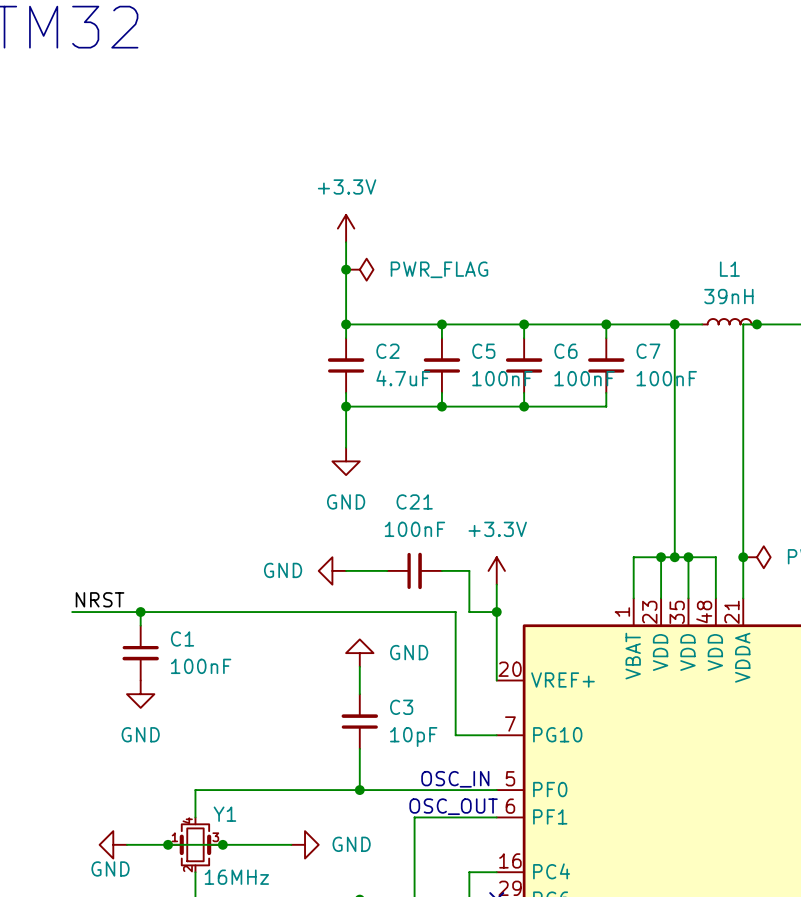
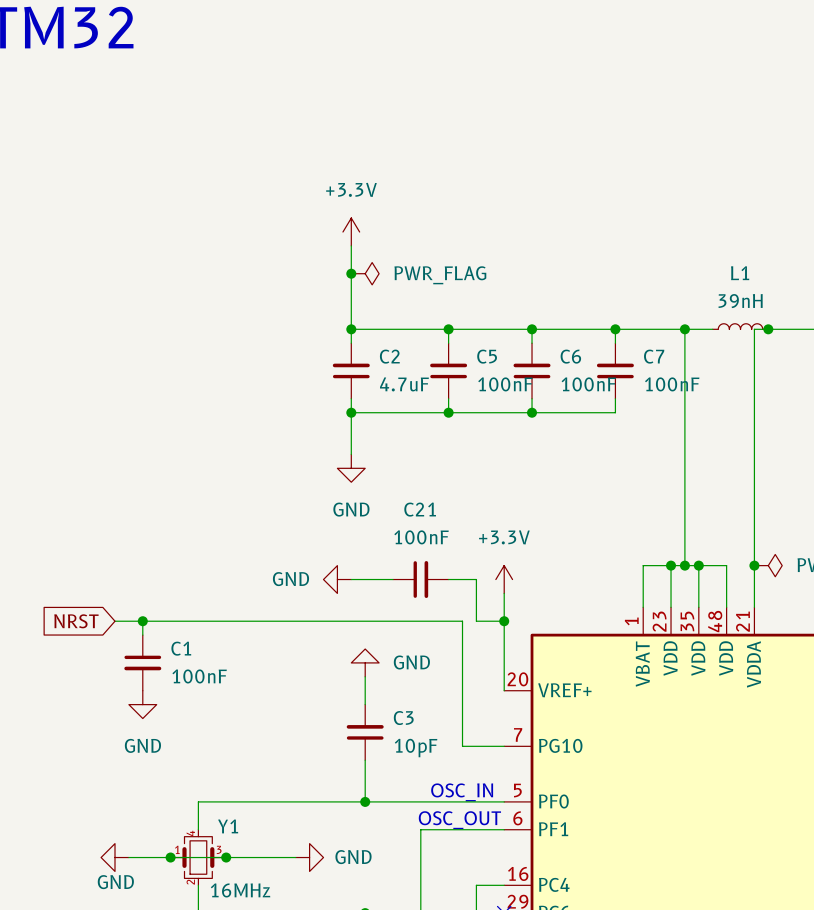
label: NRST (100, 599) -> none
wire: (72, 612) (113, 612) -> none
global label: none -> NRST (76, 621)

